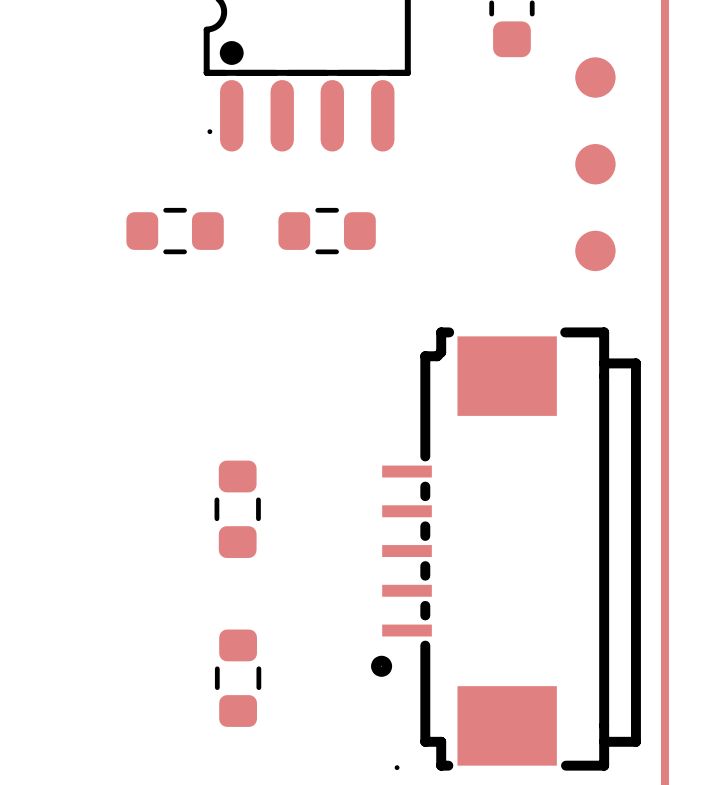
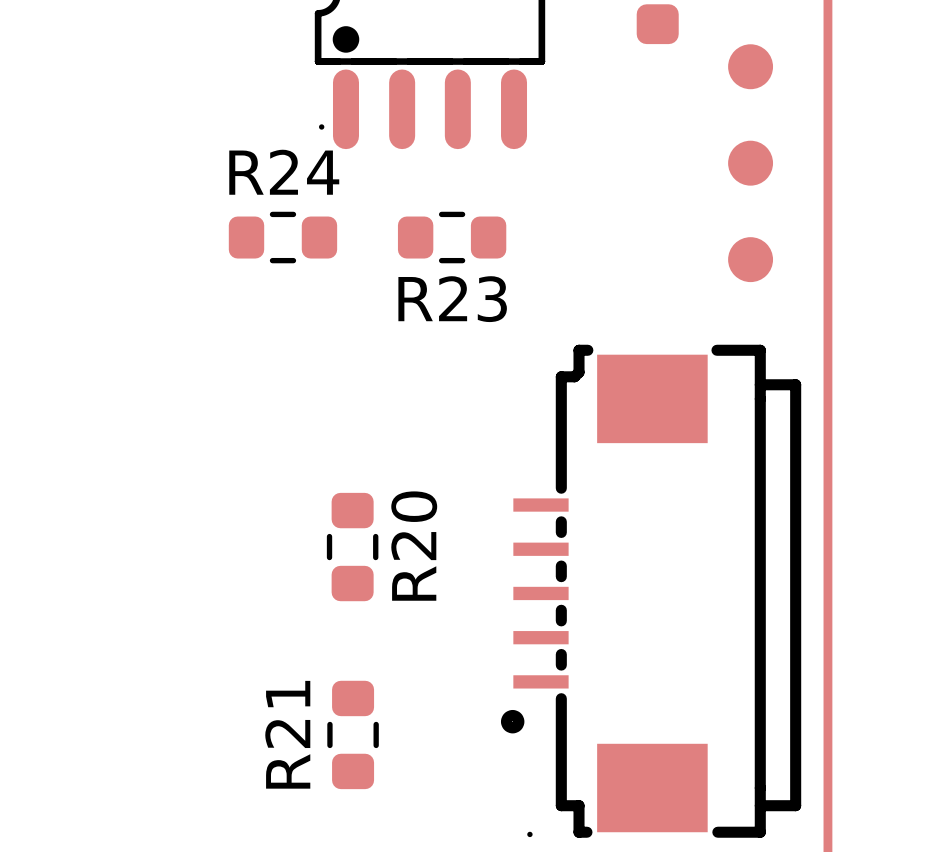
R24 name: none -> R24 (284, 172)
R23 name: none -> R23 (452, 299)
R20 name: none -> R20 (414, 546)
R21 name: none -> R21 (287, 734)

